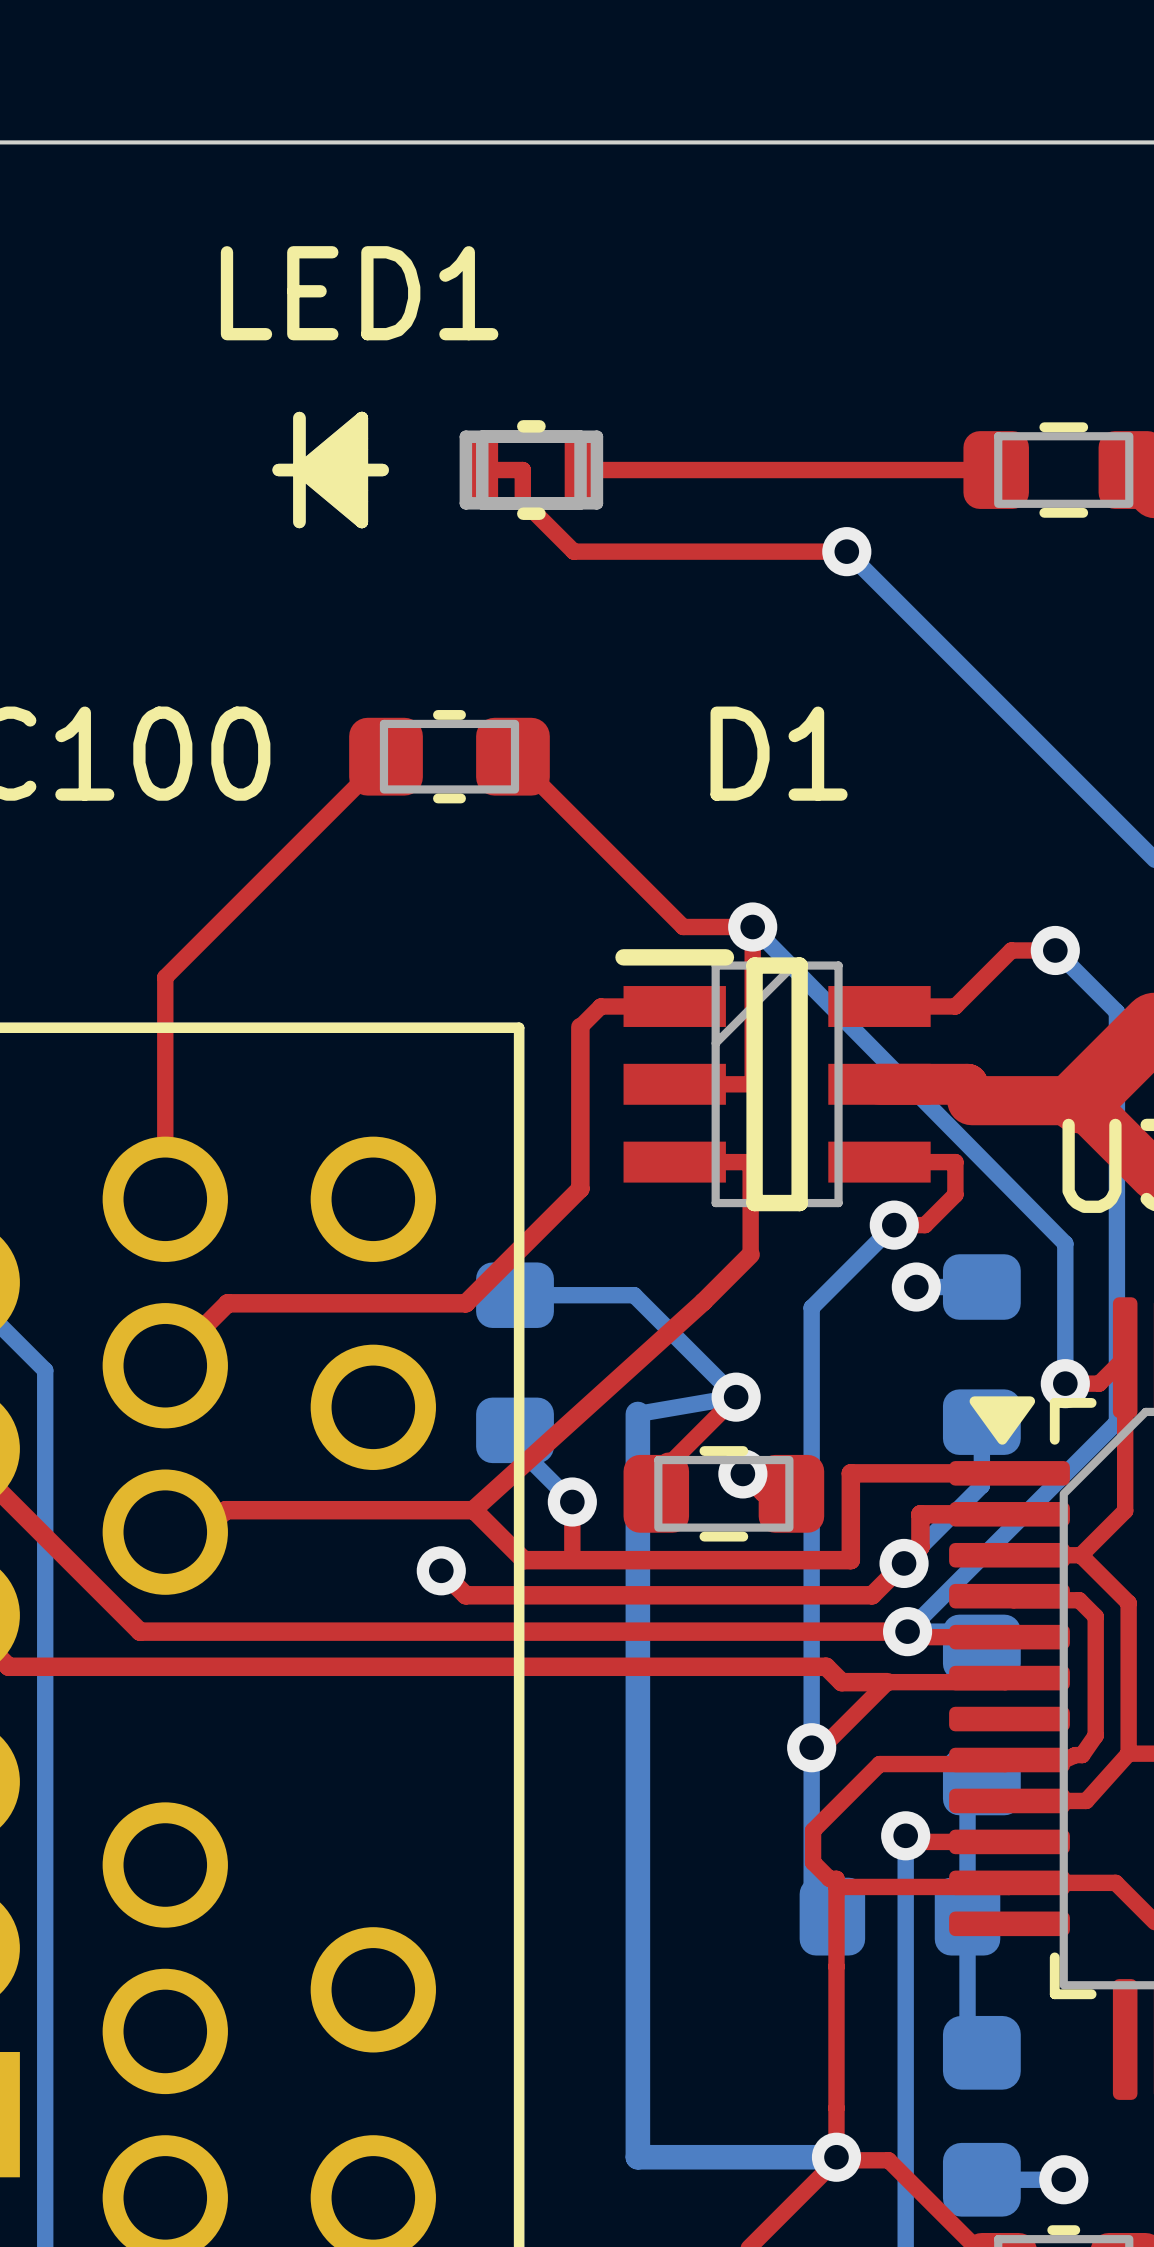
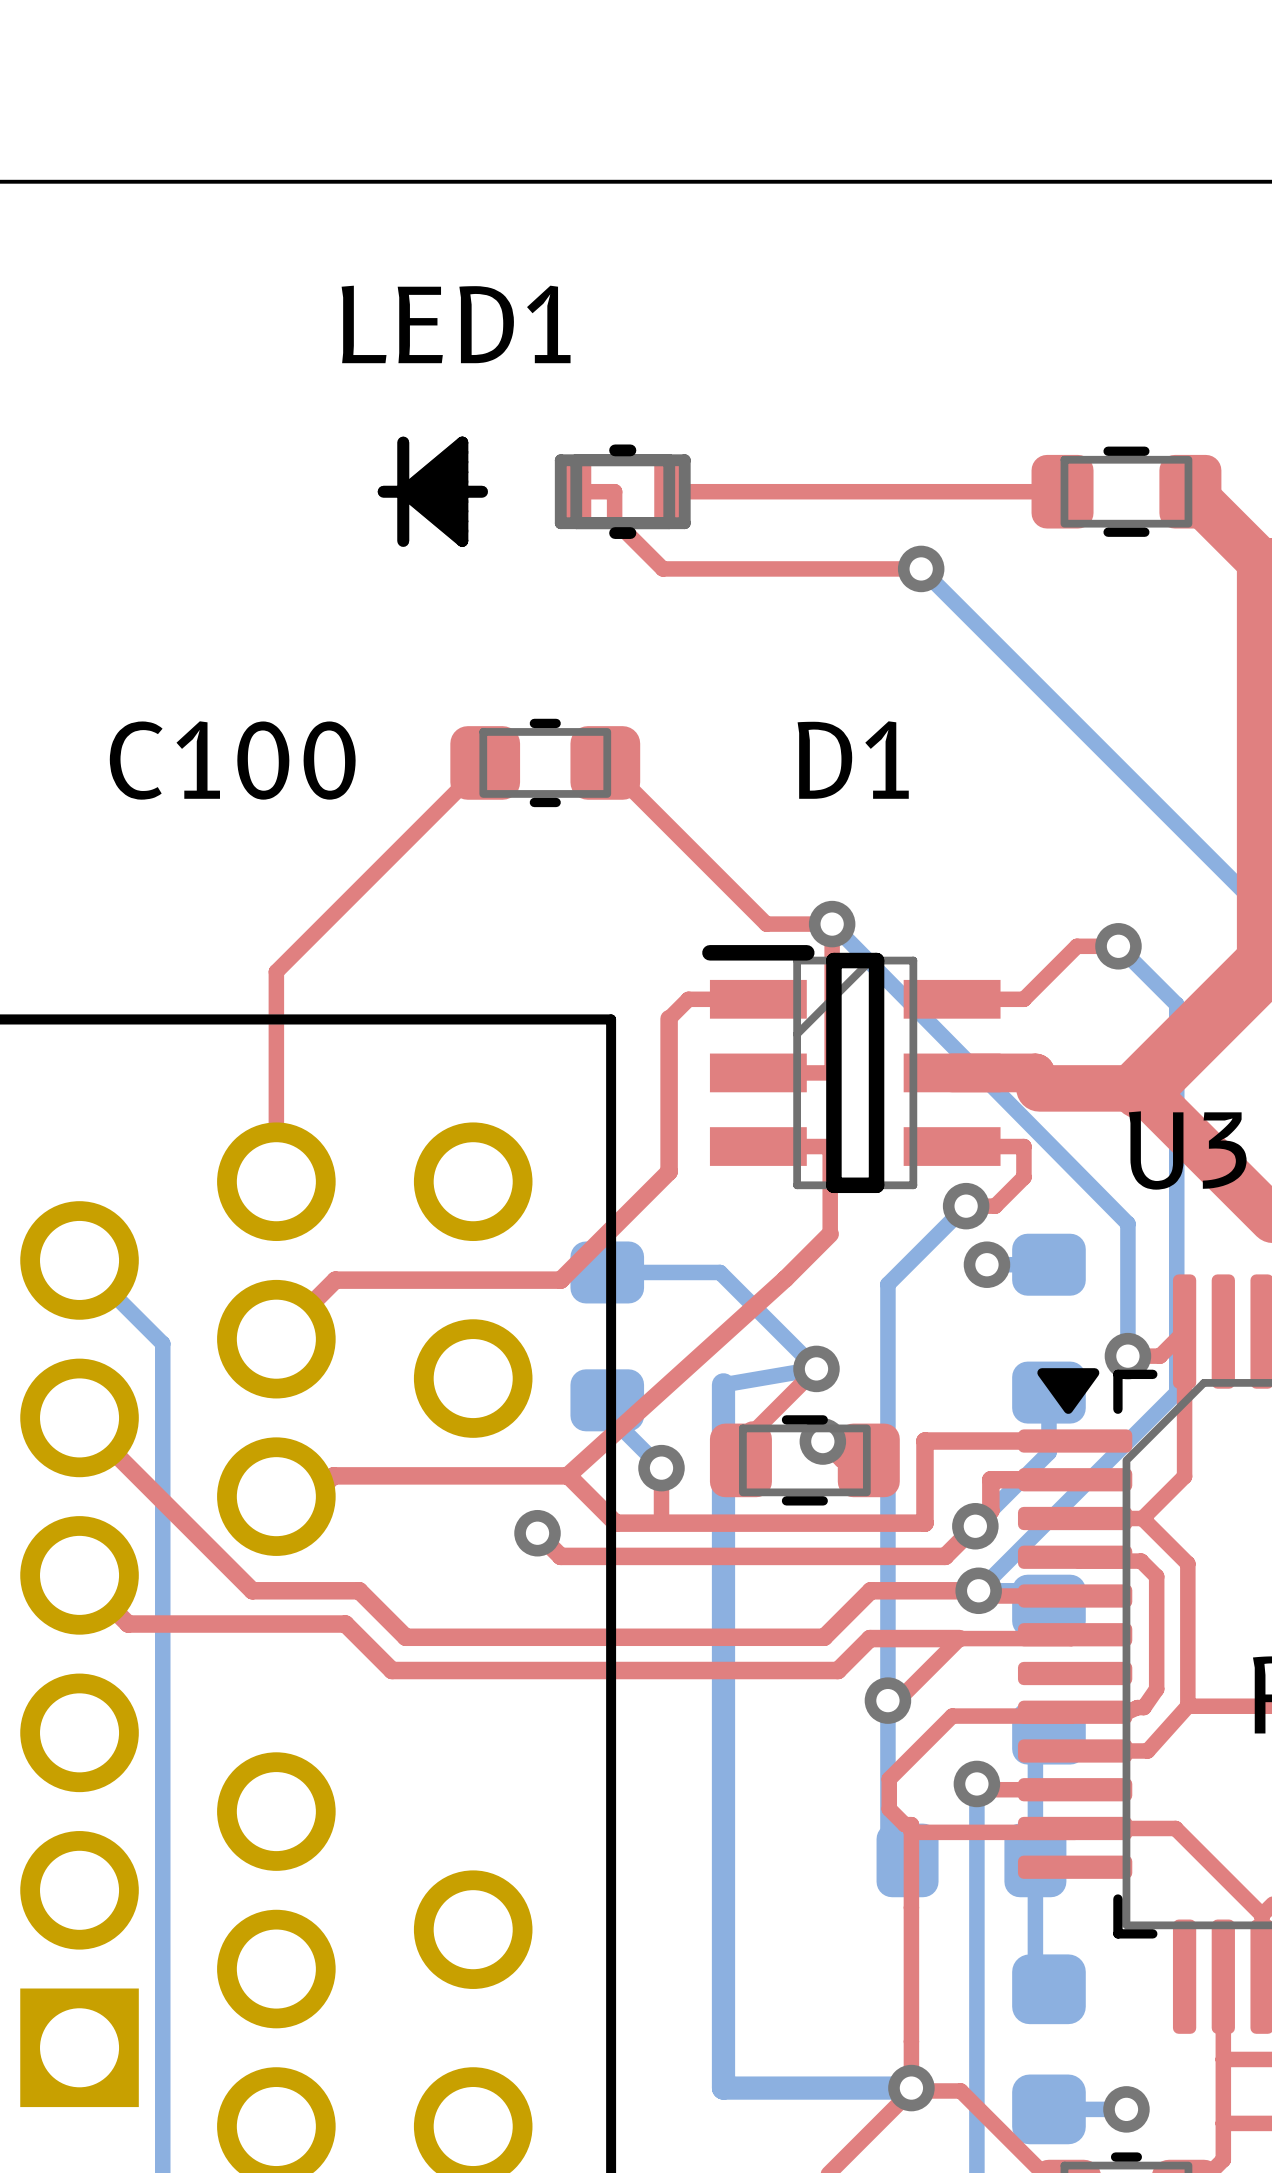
top track: (252, 1631) (793, 1631) -> (359, 1590) (405, 1637) (824, 1637) (870, 1590)
top track: (238, 1666) (826, 1666) (841, 1682) -> (345, 1624) (392, 1670) (838, 1670) (869, 1638) (916, 1638)

